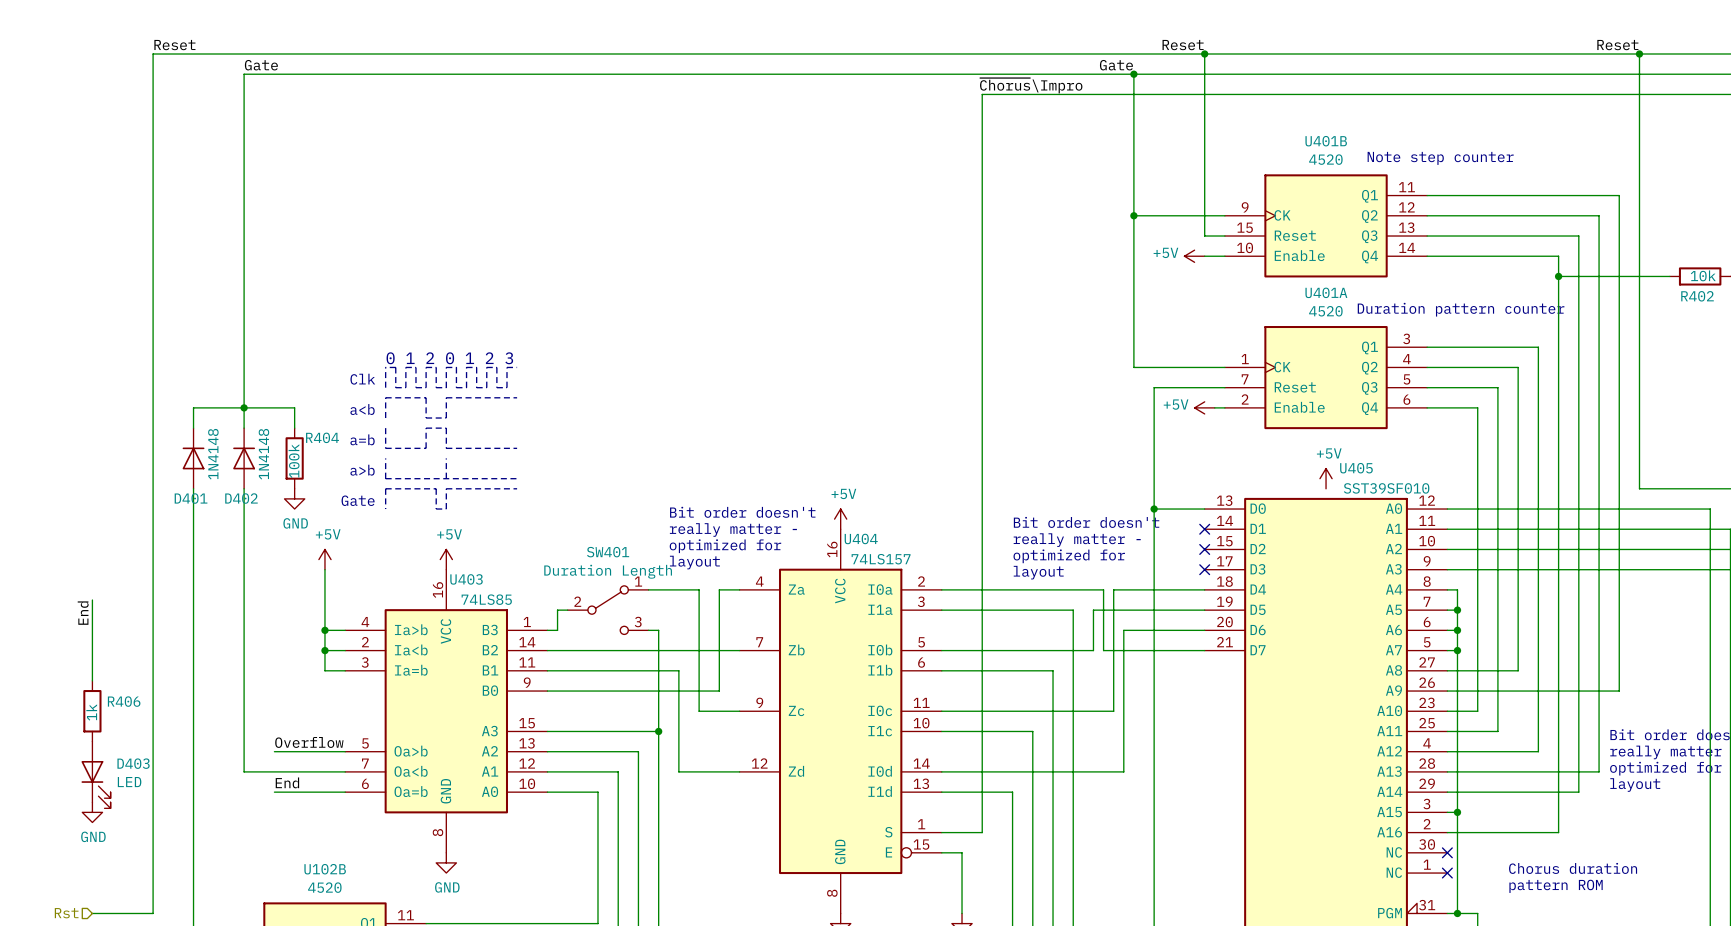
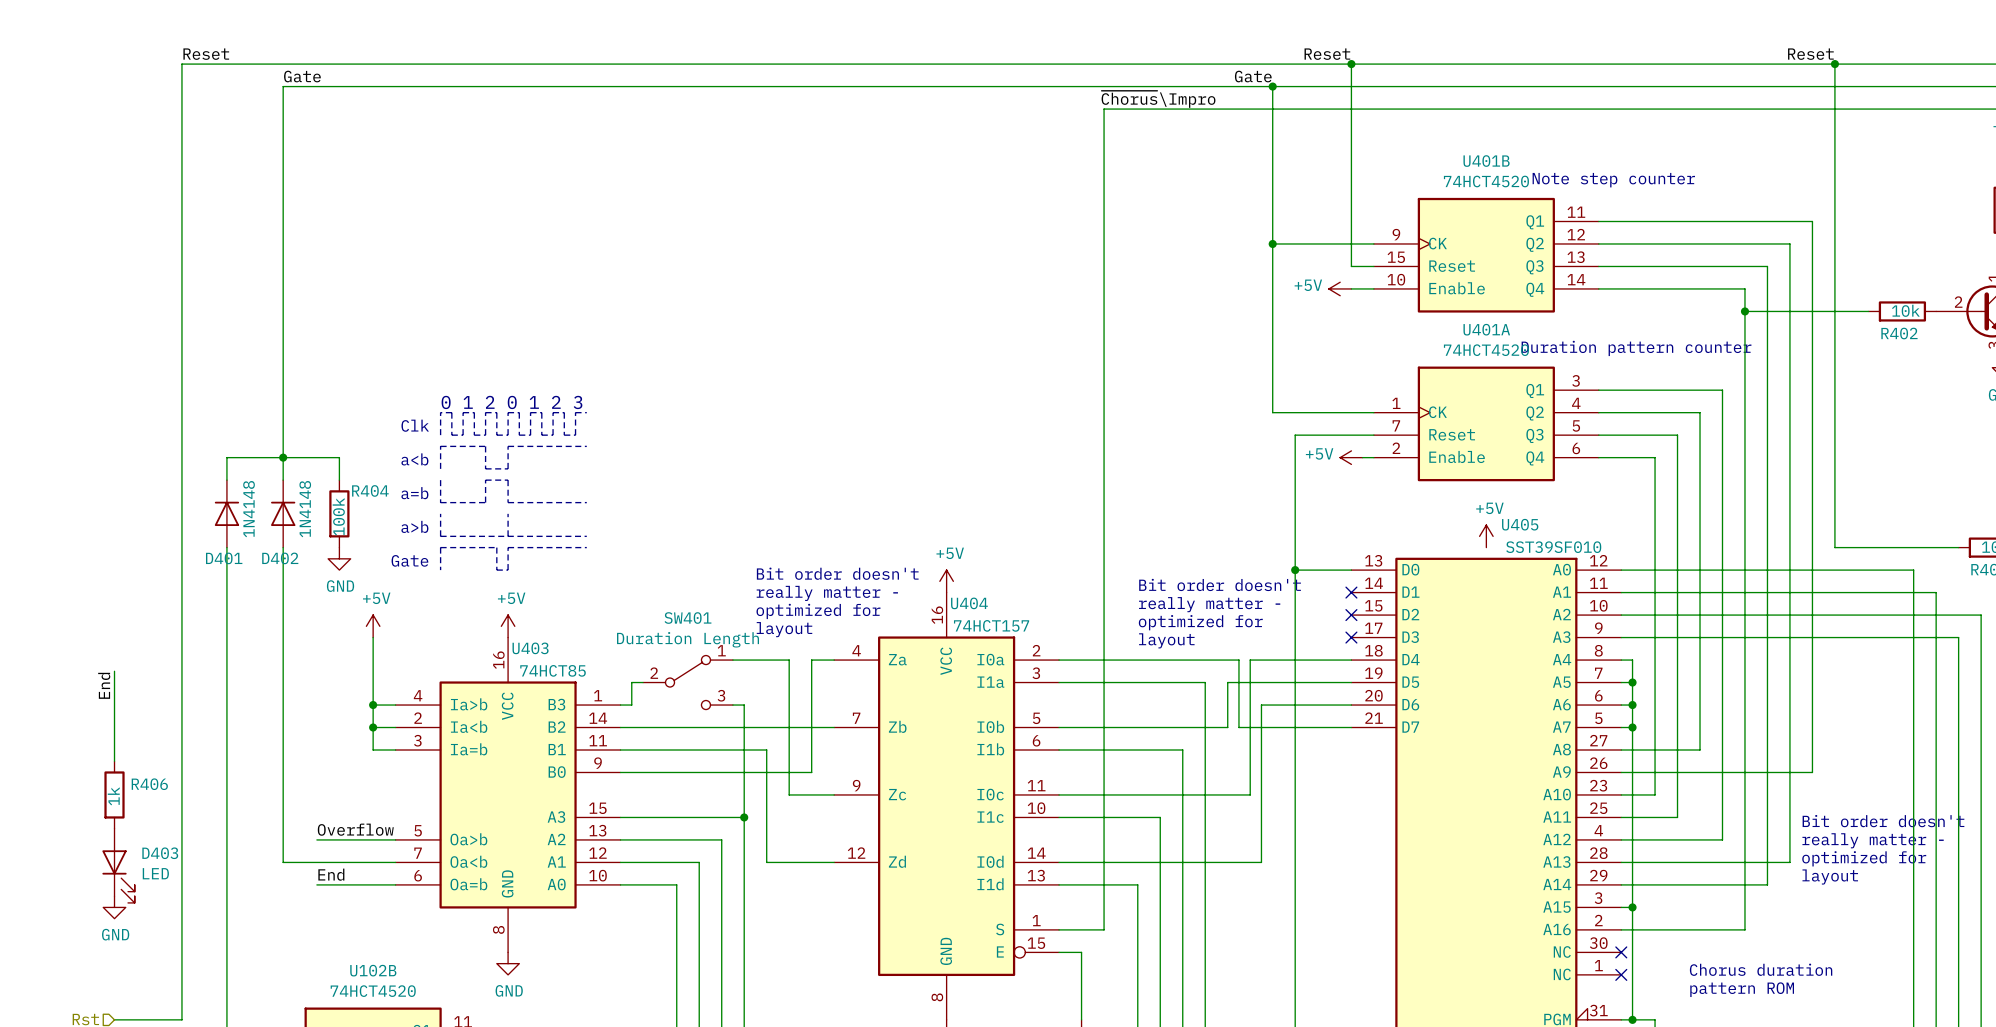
U401B value: 4520 (1325, 159) -> 74HCT4520 (1486, 181)
U401A value: 4520 (1325, 311) -> 74HCT4520 (1486, 350)
U404 value: 74LS157 (881, 559) -> 74HCT157 (991, 625)
U403 value: 74LS85 (486, 599) -> 74HCT85 (553, 670)
U102B value: 4520 (324, 887) -> 74HCT4520 (373, 991)

